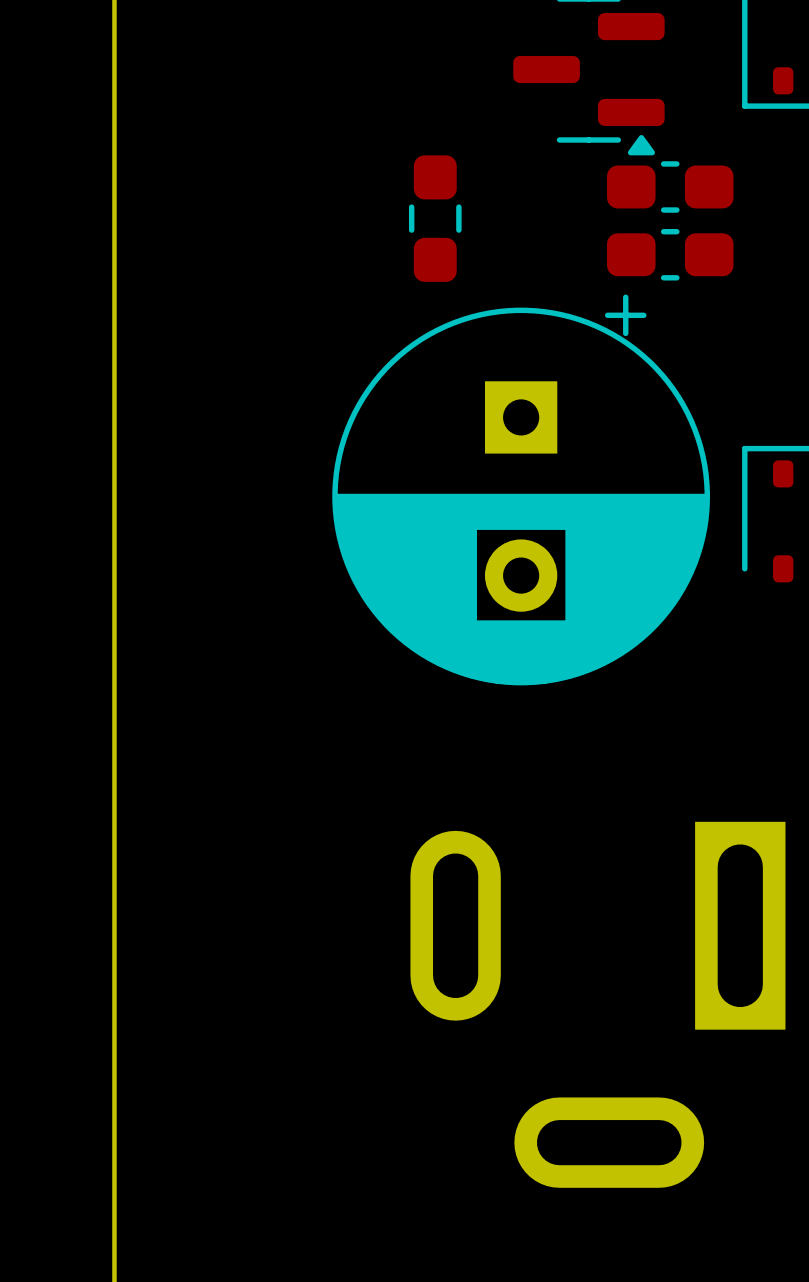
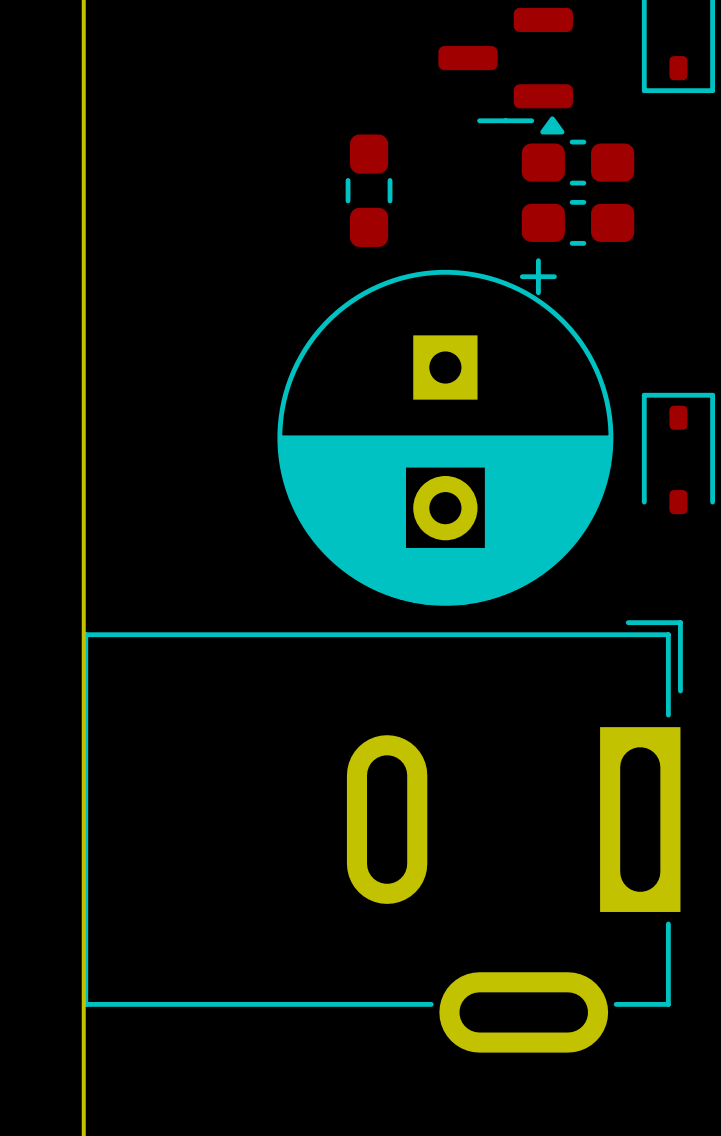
part: none -> (383, 836)

